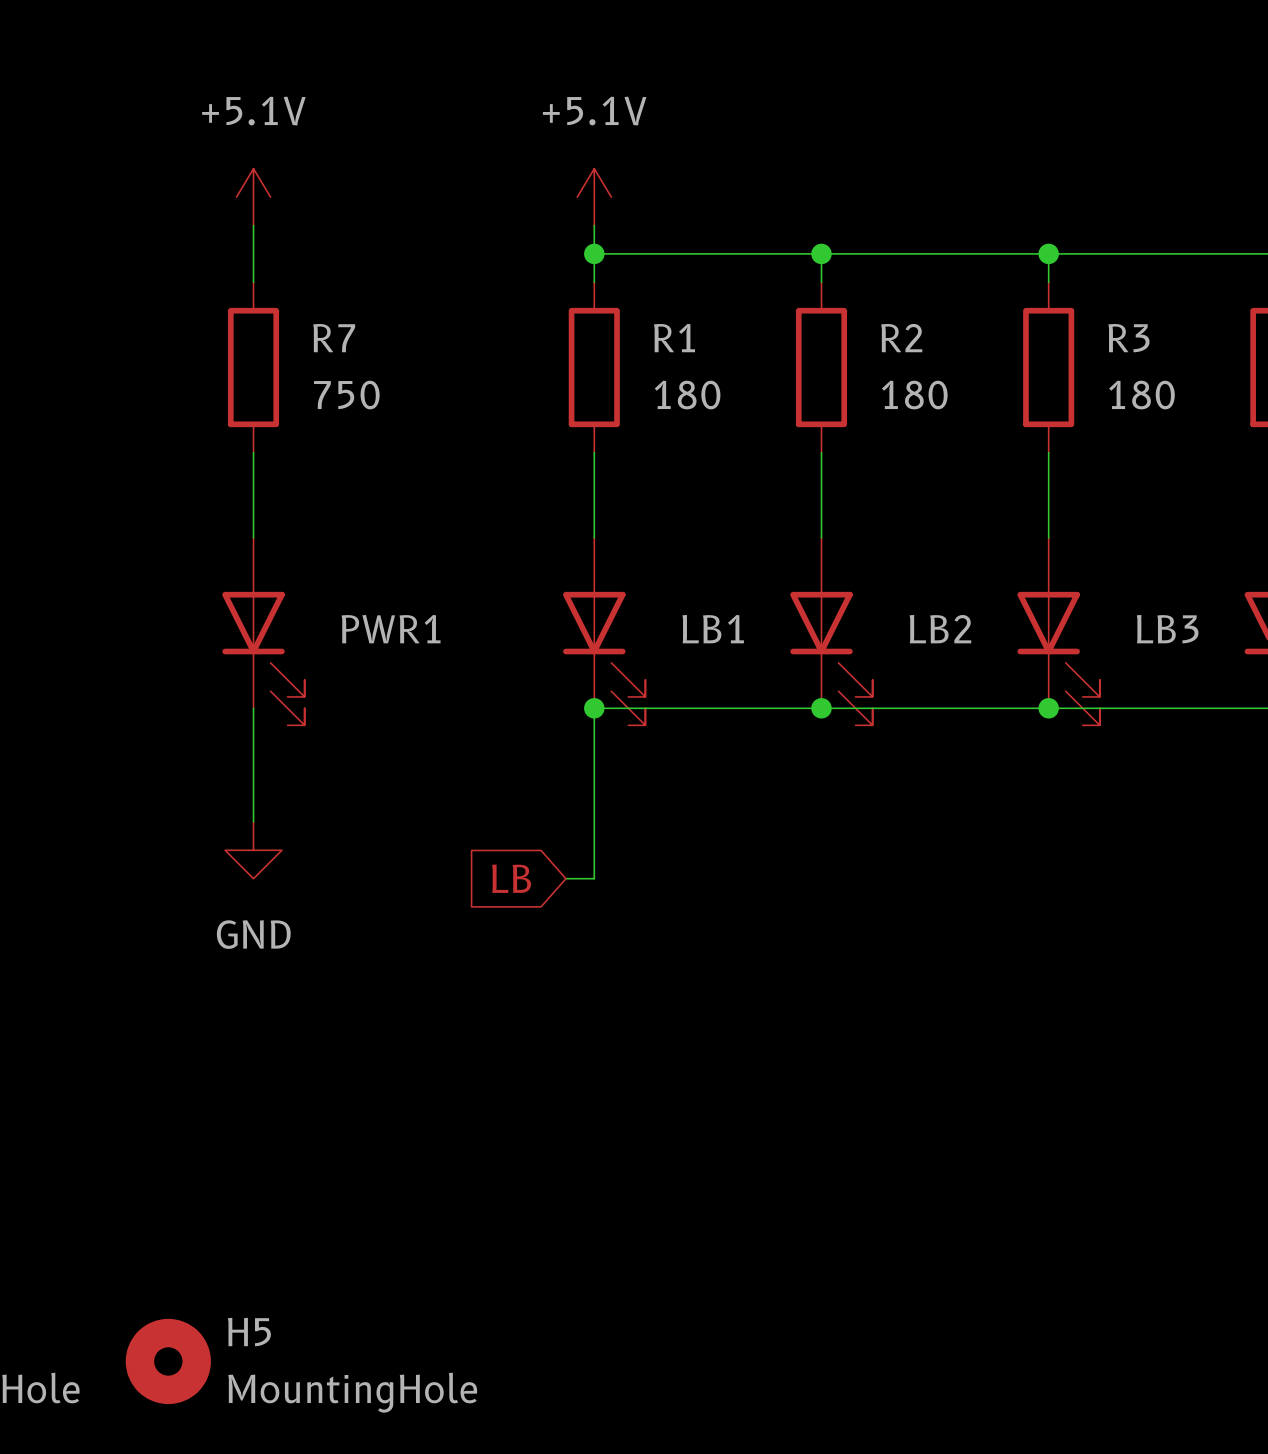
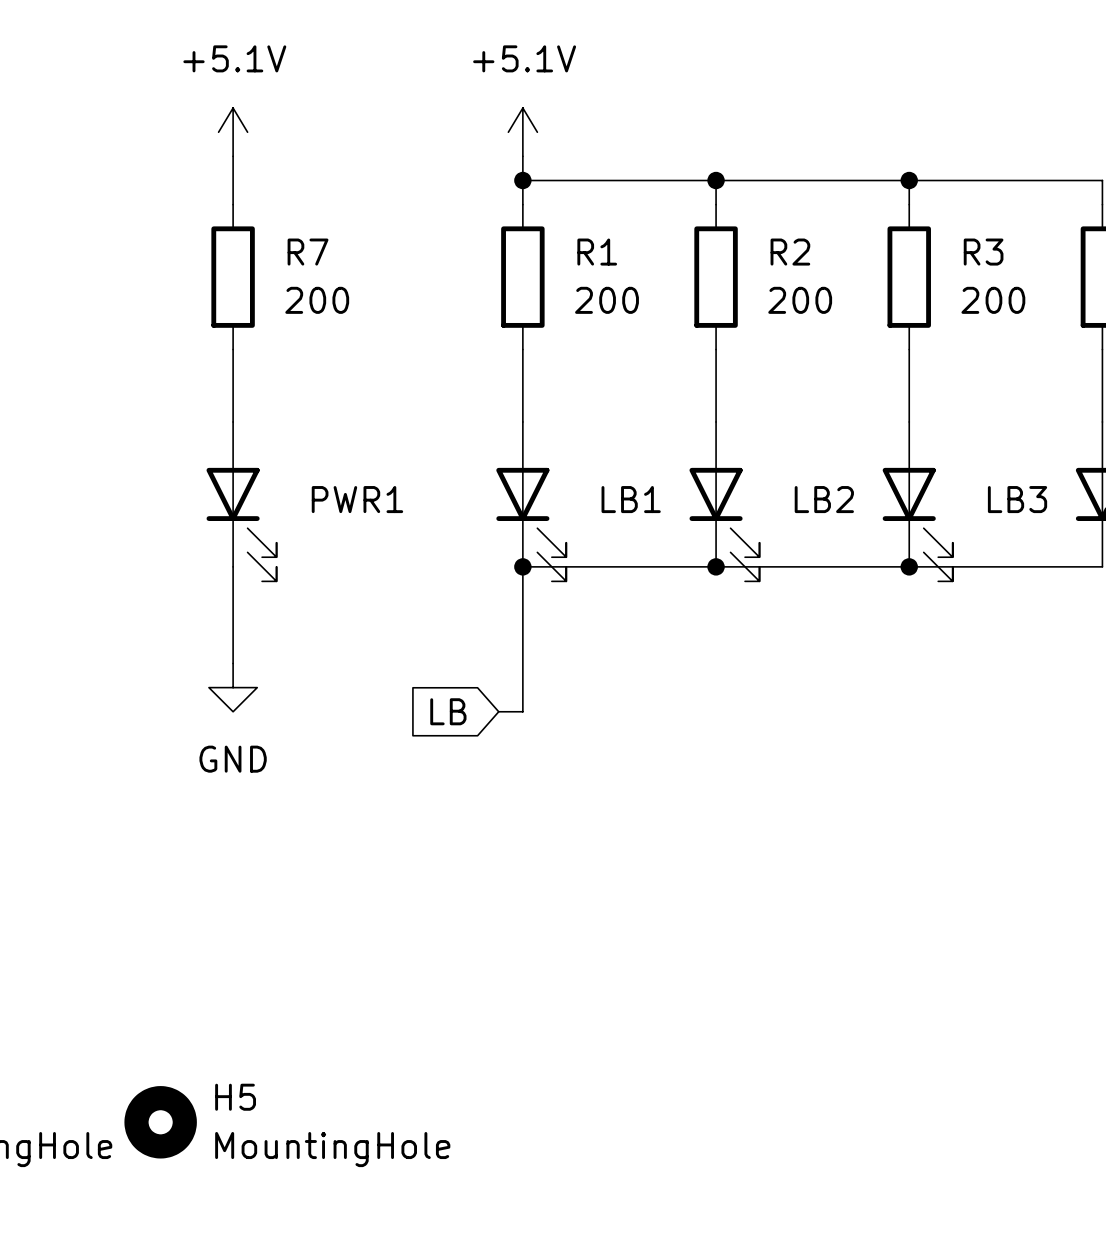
R7 value: 750 (346, 395) -> 200 (317, 300)
R1 value: 180 (687, 395) -> 200 (607, 300)
R2 value: 180 (914, 395) -> 200 (800, 300)
R3 value: 180 (1141, 395) -> 200 (993, 300)

